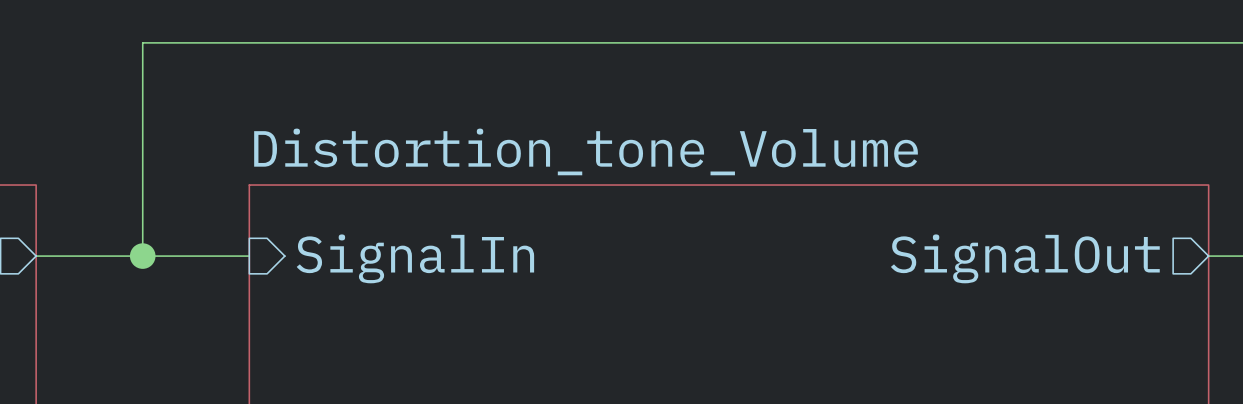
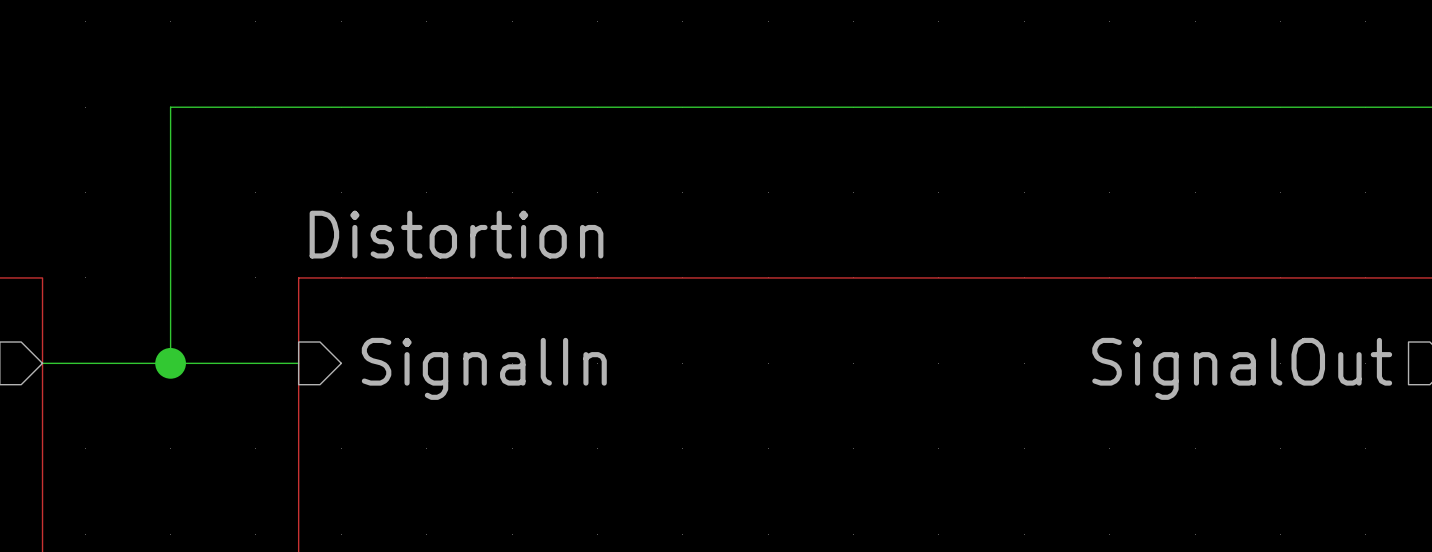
sheet Distortion_tone_Volume name: Distortion_tone_Volume (586, 151) -> Distortion (456, 234)

